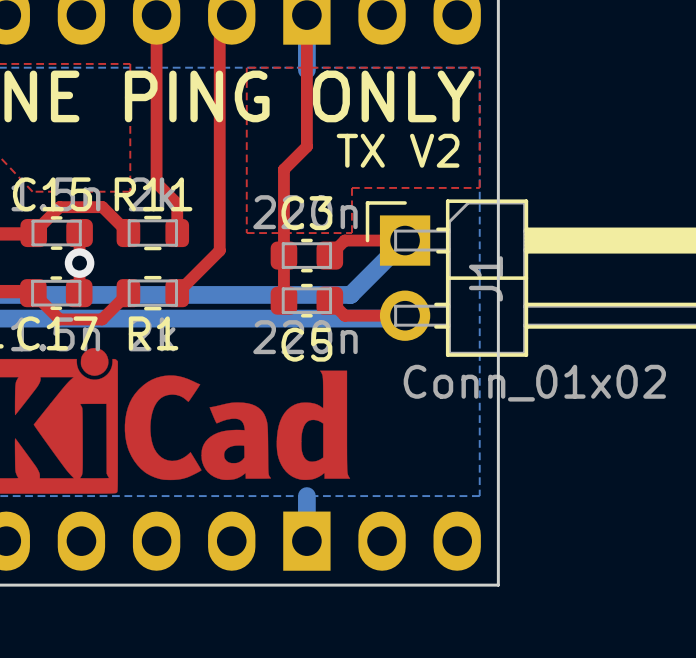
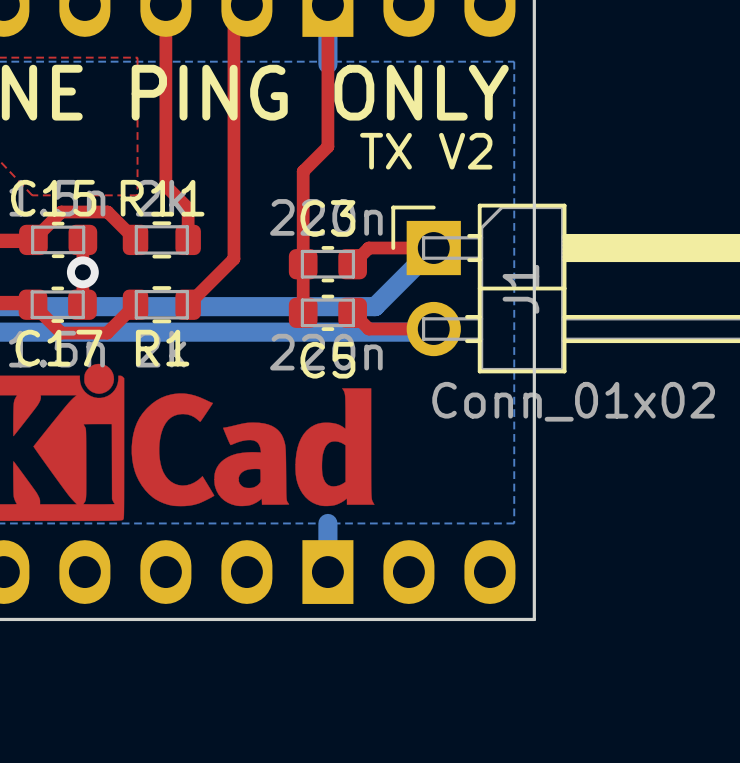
top zone outline: (246, 67) (479, 67) (479, 187) (351, 187) (351, 233) (246, 233) (246, 67) -> none

